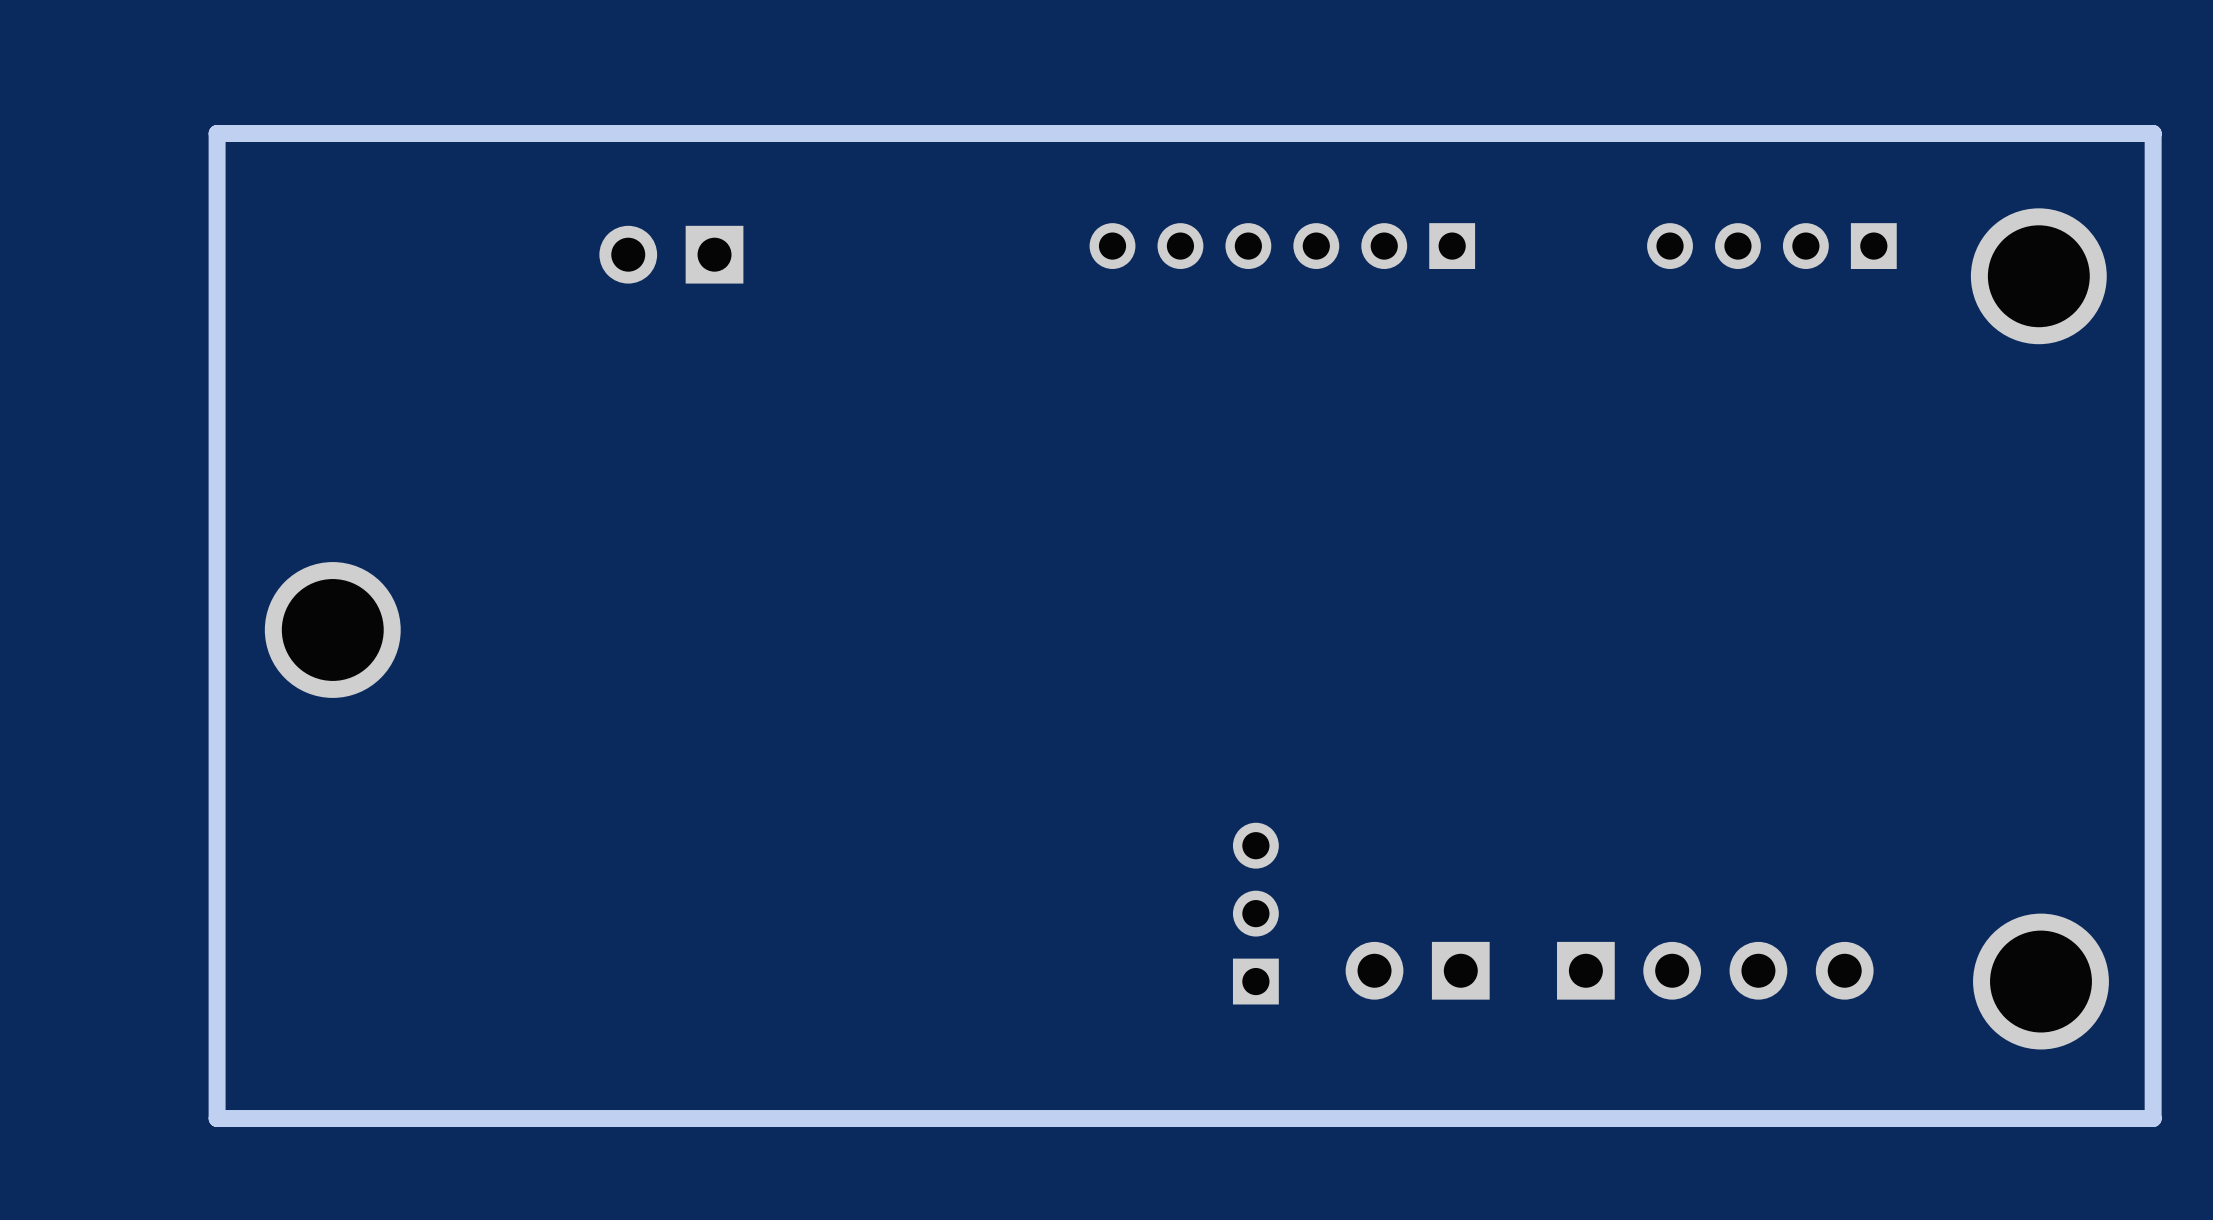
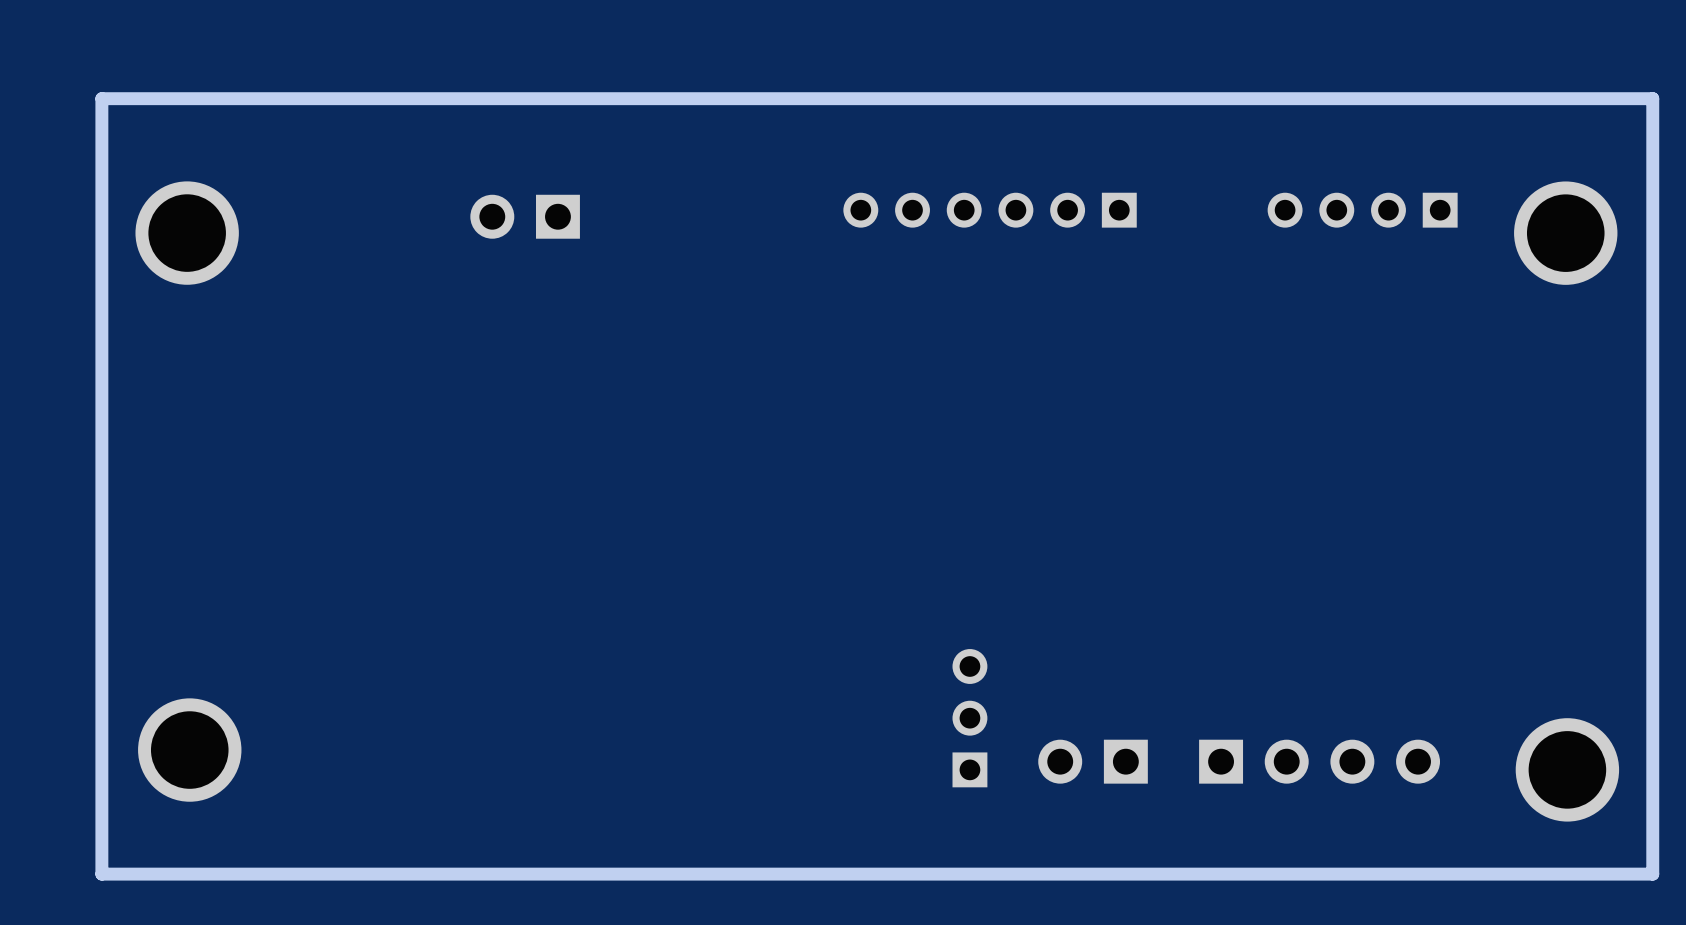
board edge: (2153, 133) (217, 133) (217, 1118) -> (1652, 124) (1652, 98) (101, 98) (101, 874) (179, 874)
part: none -> (187, 233)
part: (332, 629) -> none
part: none -> (189, 750)

